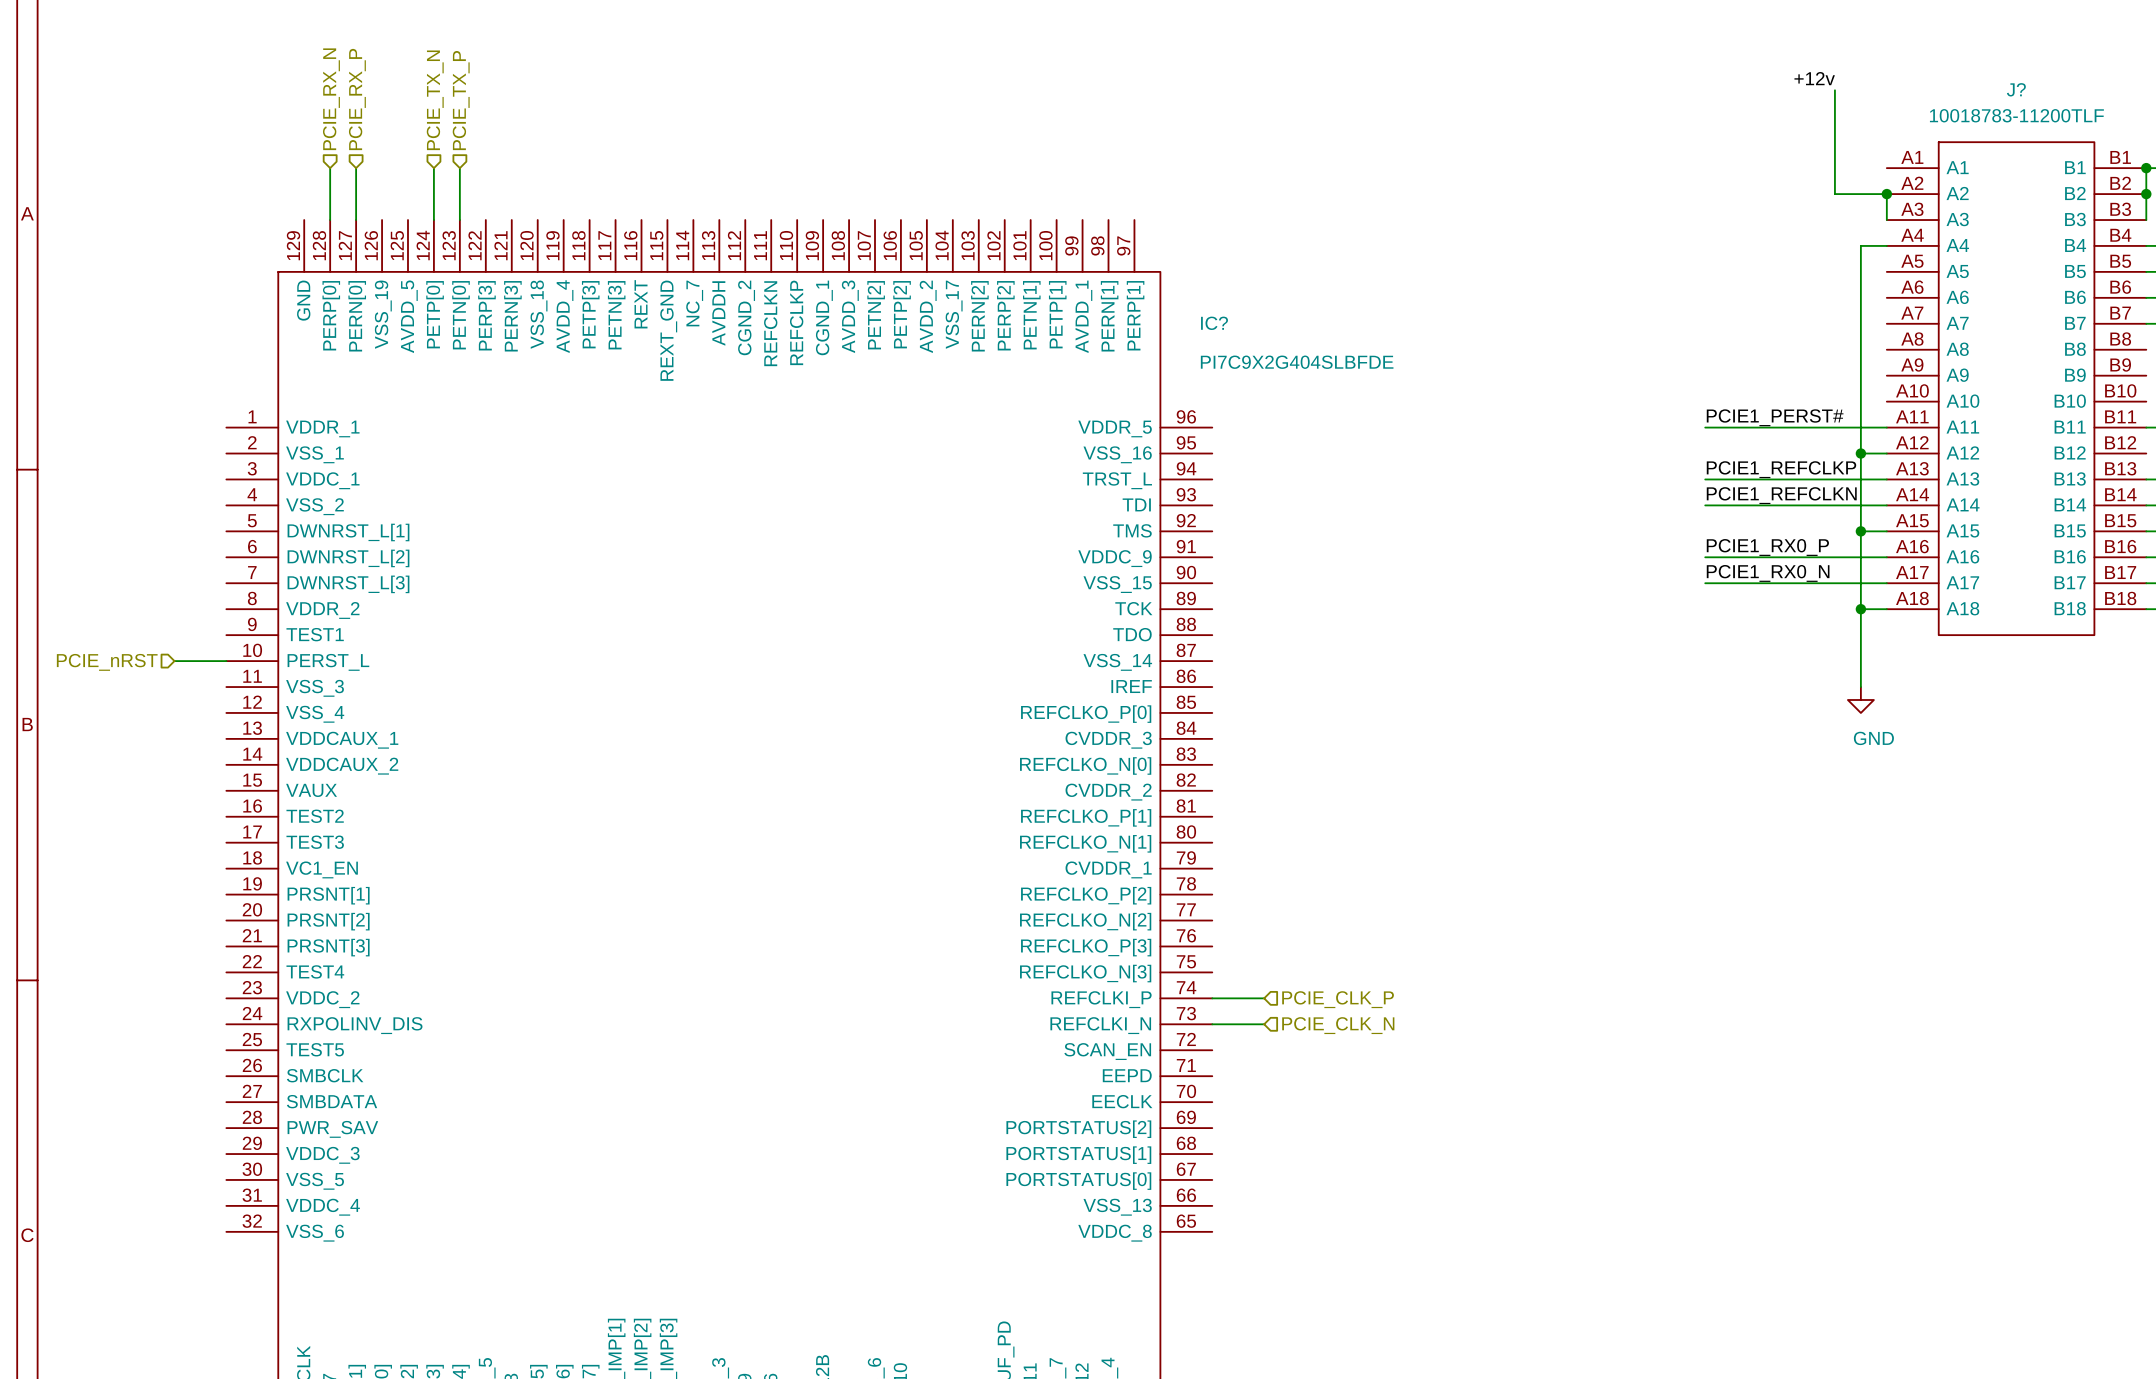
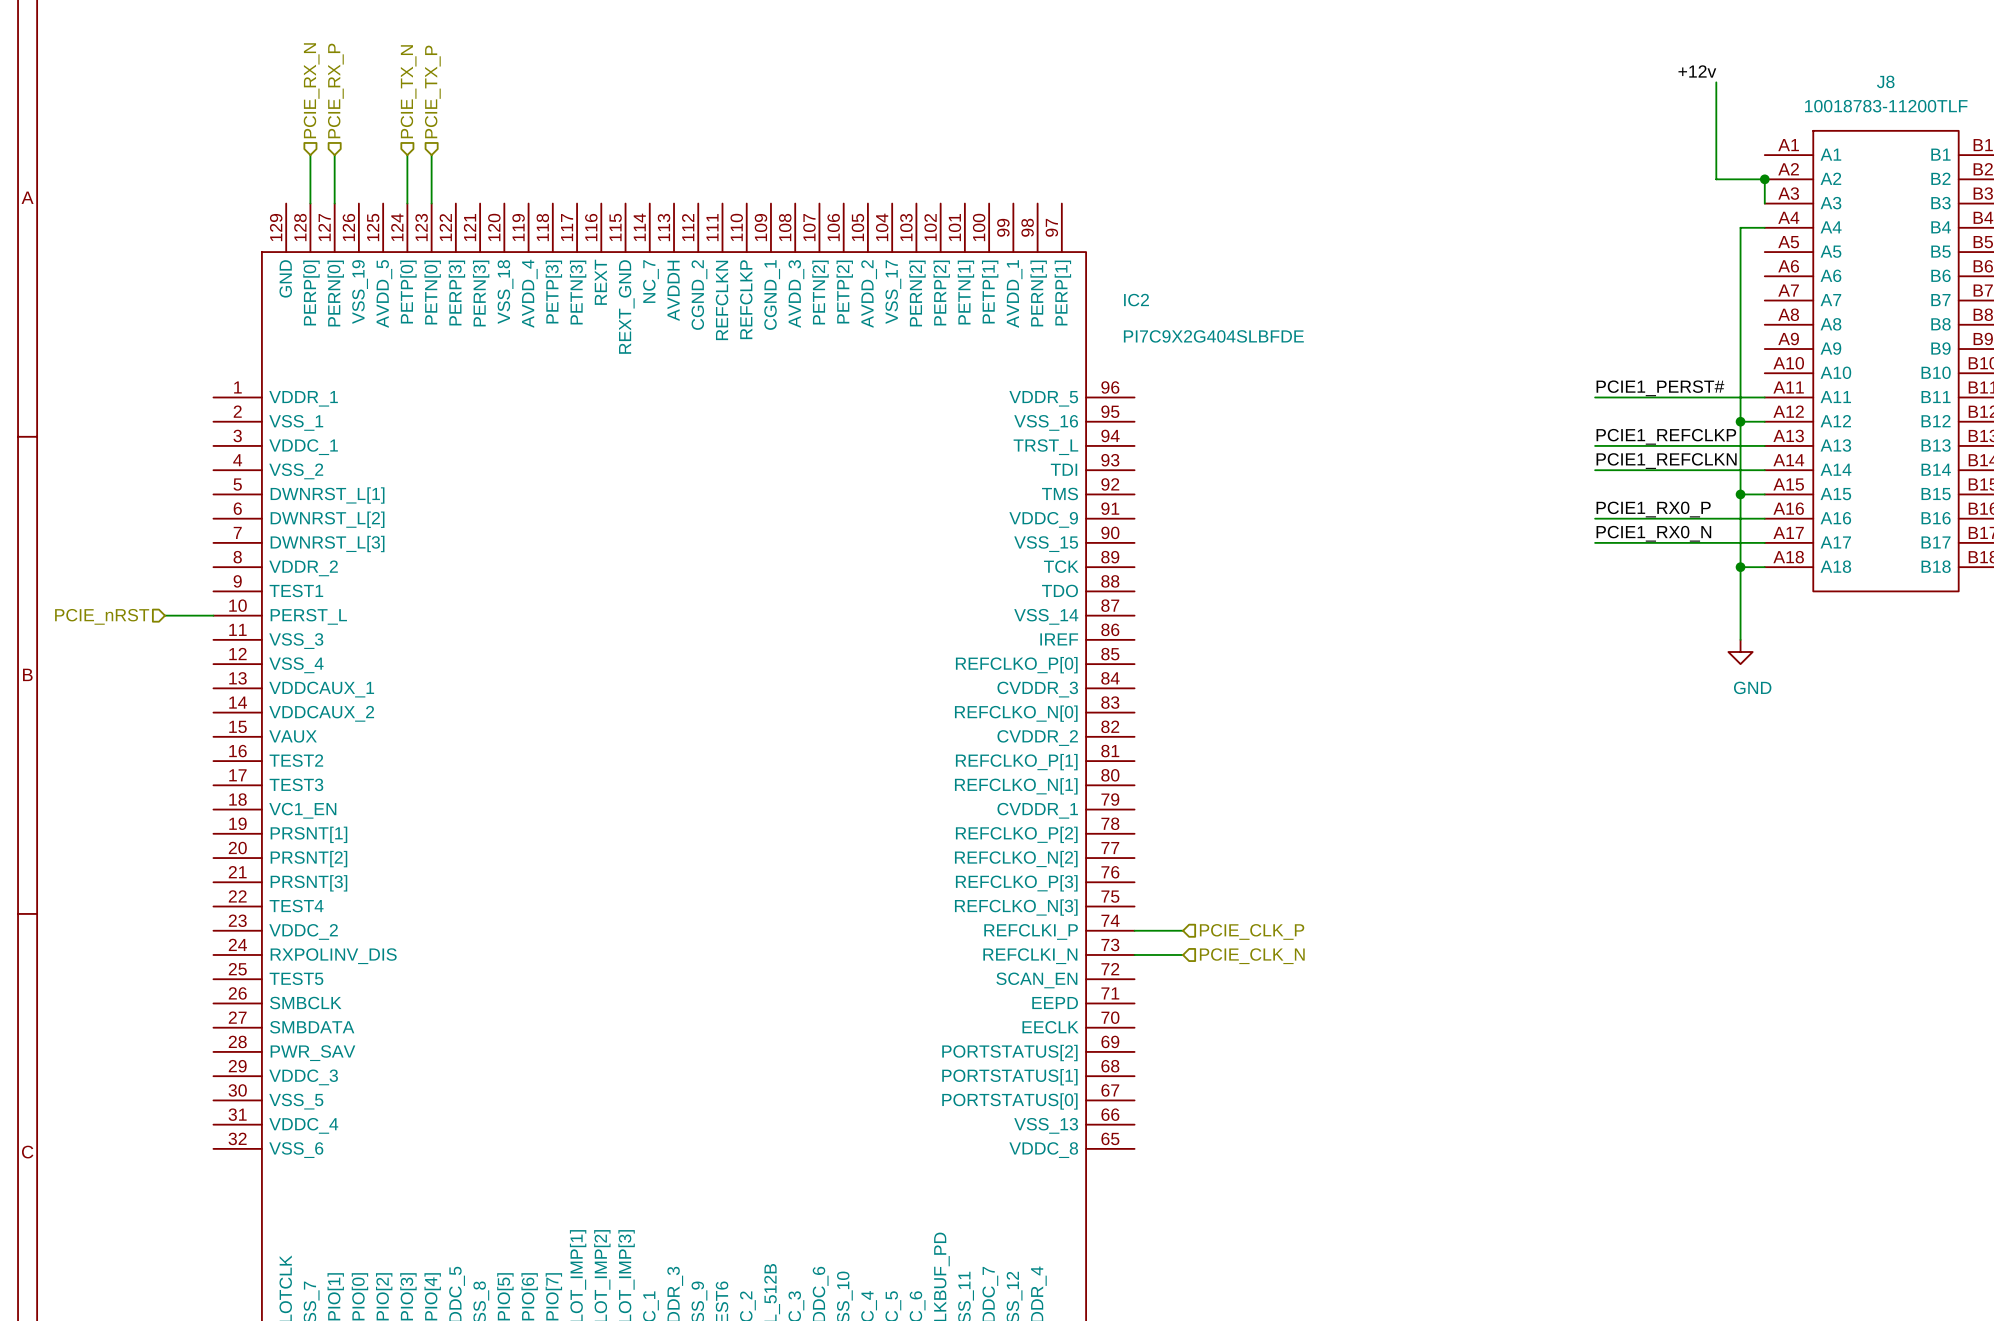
J? name: J? (2016, 89) -> J8 (1885, 81)
IC? name: IC? (1214, 323) -> IC2 (1136, 300)

